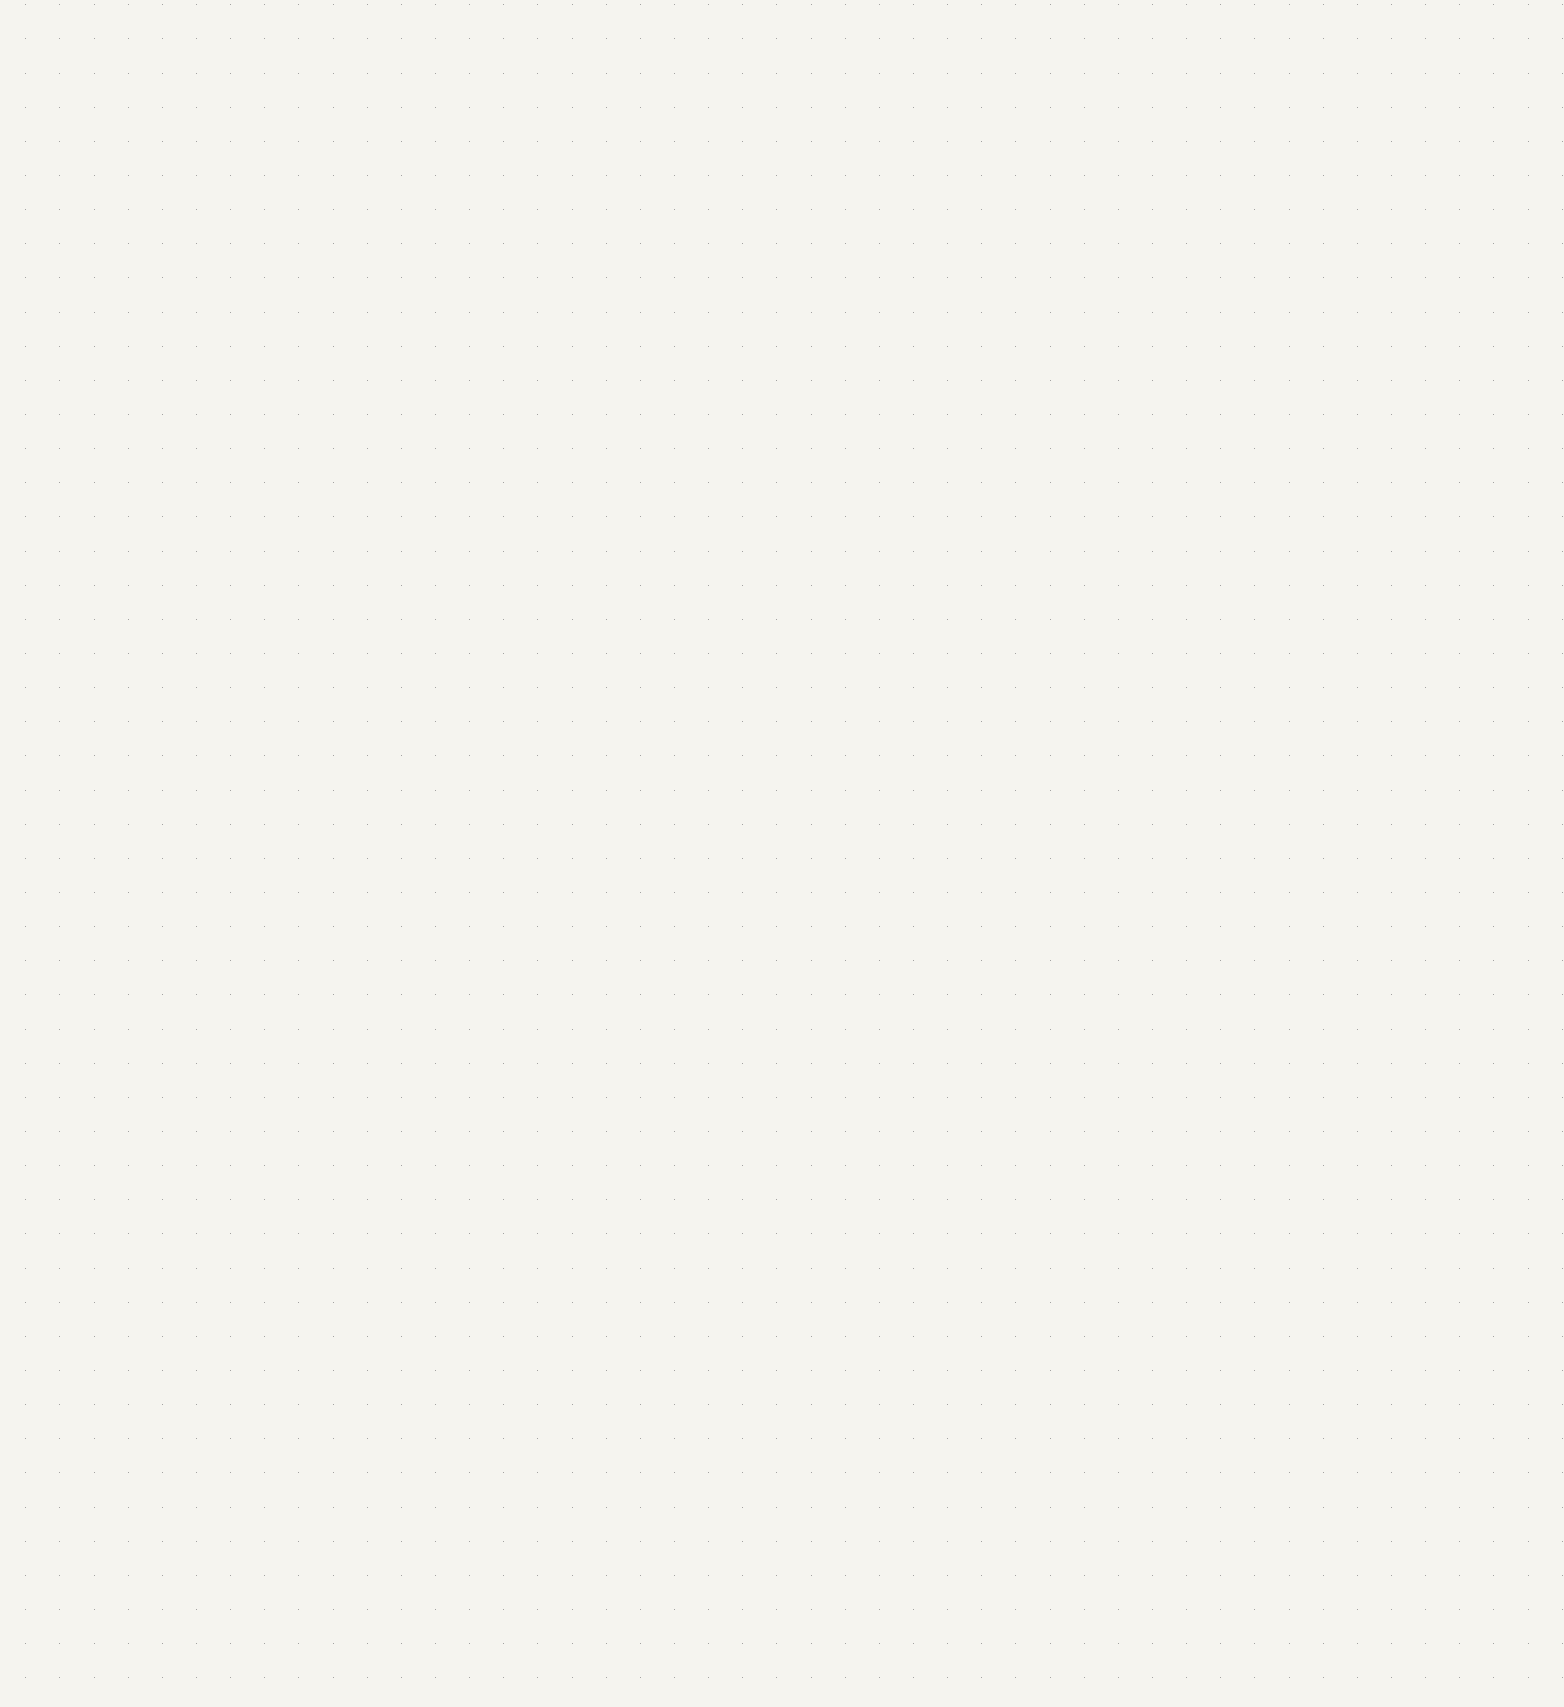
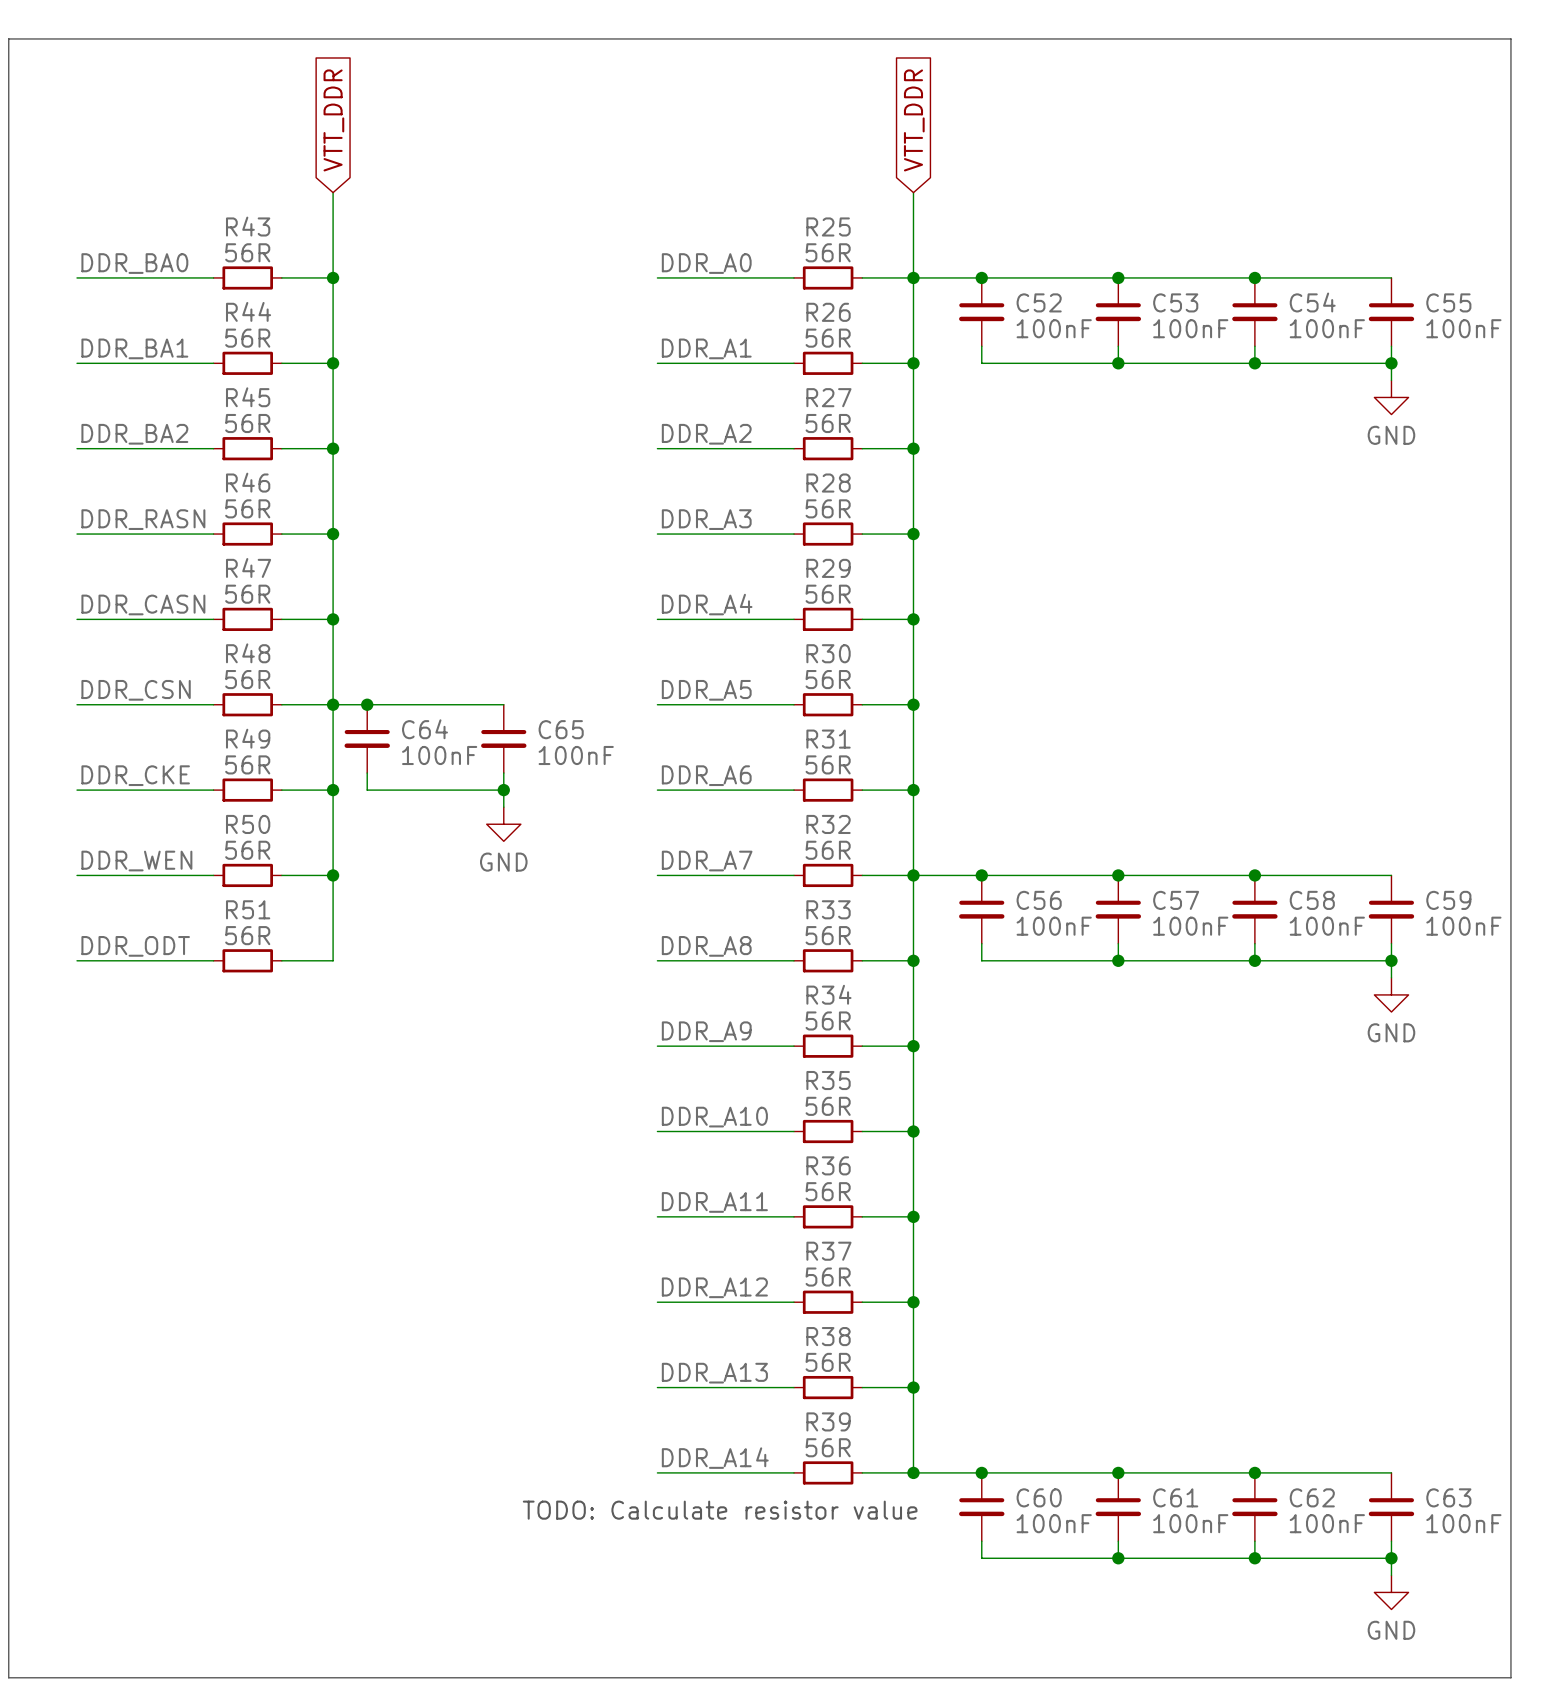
line: none -> (8, 38) (1510, 38) (1510, 1677) (8, 1677) (8, 38)
global label: none -> VTT_DDR (333, 120)
global label: none -> VTT_DDR (914, 120)
wire: none -> (333, 192) (333, 960) (281, 960)
wire: none -> (913, 192) (913, 1472)
label: none -> DDR_BA0 (134, 263)
label: none -> DDR_A0 (706, 263)
wire: none -> (77, 277) (213, 277)
R43: none -> 56R (247, 277)
wire: none -> (281, 277) (333, 277)
junction: none -> (333, 277)
wire: none -> (657, 277) (793, 277)
R25: none -> 56R (828, 277)
wire: none -> (862, 277) (1391, 277)
junction: none -> (913, 277)
junction: none -> (981, 277)
junction: none -> (1118, 277)
junction: none -> (1254, 277)
C52: none -> 100nF (981, 312)
C53: none -> 100nF (1118, 312)
C54: none -> 100nF (1254, 312)
C55: none -> 100nF (1391, 312)
wire: none -> (981, 346) (981, 363) (1391, 363)
wire: none -> (1118, 346) (1118, 363)
wire: none -> (1254, 346) (1254, 363)
wire: none -> (1391, 346) (1391, 380)
label: none -> DDR_BA1 (134, 348)
label: none -> DDR_A1 (706, 348)
wire: none -> (77, 363) (213, 363)
R44: none -> 56R (247, 363)
wire: none -> (281, 363) (333, 363)
junction: none -> (333, 363)
wire: none -> (657, 363) (793, 363)
R26: none -> 56R (828, 363)
wire: none -> (862, 363) (913, 363)
junction: none -> (913, 363)
junction: none -> (1118, 363)
junction: none -> (1254, 363)
junction: none -> (1391, 363)
power symbol: none -> GND (1391, 397)
label: none -> DDR_BA2 (134, 434)
label: none -> DDR_A2 (706, 434)
wire: none -> (77, 448) (213, 448)
R45: none -> 56R (247, 448)
wire: none -> (281, 448) (333, 448)
junction: none -> (333, 448)
wire: none -> (657, 448) (793, 448)
R27: none -> 56R (828, 448)
wire: none -> (862, 448) (913, 448)
junction: none -> (913, 448)
label: none -> DDR_RASN (143, 519)
label: none -> DDR_A3 (706, 519)
wire: none -> (77, 534) (213, 534)
R46: none -> 56R (247, 534)
wire: none -> (281, 534) (333, 534)
junction: none -> (333, 534)
wire: none -> (657, 534) (793, 534)
R28: none -> 56R (828, 534)
wire: none -> (862, 534) (913, 534)
junction: none -> (913, 534)
label: none -> DDR_CASN (143, 604)
label: none -> DDR_A4 (707, 604)
wire: none -> (77, 619) (213, 619)
R47: none -> 56R (247, 619)
wire: none -> (281, 619) (333, 619)
junction: none -> (333, 619)
wire: none -> (657, 619) (793, 619)
R29: none -> 56R (828, 619)
wire: none -> (862, 619) (913, 619)
junction: none -> (913, 619)
label: none -> DDR_CSN (136, 690)
label: none -> DDR_A5 (706, 690)
wire: none -> (77, 704) (213, 704)
R48: none -> 56R (247, 704)
wire: none -> (281, 704) (503, 704)
junction: none -> (333, 704)
junction: none -> (367, 704)
wire: none -> (657, 704) (793, 704)
R30: none -> 56R (828, 704)
wire: none -> (862, 704) (913, 704)
junction: none -> (913, 704)
C64: none -> 100nF (367, 738)
C65: none -> 100nF (503, 738)
wire: none -> (367, 773) (367, 790) (503, 790)
wire: none -> (503, 773) (503, 807)
label: none -> DDR_CKE (135, 775)
label: none -> DDR_A6 (706, 775)
wire: none -> (77, 790) (213, 790)
R49: none -> 56R (247, 790)
wire: none -> (281, 790) (333, 790)
junction: none -> (333, 790)
junction: none -> (503, 790)
wire: none -> (657, 790) (793, 790)
R31: none -> 56R (828, 790)
wire: none -> (862, 790) (913, 790)
junction: none -> (913, 790)
power symbol: none -> GND (503, 824)
label: none -> DDR_WEN (136, 861)
label: none -> DDR_A7 (707, 861)
wire: none -> (77, 875) (213, 875)
R50: none -> 56R (247, 875)
wire: none -> (281, 875) (333, 875)
junction: none -> (333, 875)
wire: none -> (657, 875) (793, 875)
R32: none -> 56R (828, 875)
wire: none -> (862, 875) (1391, 875)
junction: none -> (913, 875)
junction: none -> (981, 875)
junction: none -> (1118, 875)
junction: none -> (1254, 875)
C56: none -> 100nF (981, 909)
C57: none -> 100nF (1118, 909)
C58: none -> 100nF (1254, 909)
C59: none -> 100nF (1391, 909)
wire: none -> (981, 943) (981, 960) (1391, 960)
wire: none -> (1118, 943) (1118, 960)
wire: none -> (1254, 943) (1254, 960)
wire: none -> (1391, 943) (1391, 977)
label: none -> DDR_ODT (135, 946)
label: none -> DDR_A8 (706, 946)
wire: none -> (77, 960) (213, 960)
R51: none -> 56R (247, 960)
wire: none -> (657, 960) (793, 960)
R33: none -> 56R (828, 960)
wire: none -> (862, 960) (913, 960)
junction: none -> (913, 960)
junction: none -> (1118, 960)
junction: none -> (1254, 960)
junction: none -> (1391, 960)
power symbol: none -> GND (1391, 994)
label: none -> DDR_A9 (706, 1031)
wire: none -> (657, 1046) (793, 1046)
R34: none -> 56R (828, 1046)
wire: none -> (862, 1046) (913, 1046)
junction: none -> (913, 1046)
label: none -> DDR_A10 (714, 1117)
wire: none -> (657, 1131) (793, 1131)
R35: none -> 56R (828, 1131)
wire: none -> (862, 1131) (913, 1131)
junction: none -> (913, 1131)
label: none -> DDR_A11 (714, 1202)
wire: none -> (657, 1216) (793, 1216)
R36: none -> 56R (828, 1216)
wire: none -> (862, 1216) (913, 1216)
junction: none -> (913, 1216)
label: none -> DDR_A12 (714, 1287)
wire: none -> (657, 1302) (793, 1302)
R37: none -> 56R (828, 1302)
wire: none -> (862, 1302) (913, 1302)
junction: none -> (913, 1302)
label: none -> DDR_A13 (714, 1373)
wire: none -> (657, 1387) (793, 1387)
R38: none -> 56R (828, 1387)
wire: none -> (862, 1387) (913, 1387)
junction: none -> (913, 1387)
label: none -> DDR_A14 (715, 1458)
wire: none -> (657, 1472) (793, 1472)
R39: none -> 56R (828, 1472)
wire: none -> (862, 1472) (1391, 1472)
junction: none -> (913, 1472)
junction: none -> (981, 1472)
junction: none -> (1118, 1472)
junction: none -> (1254, 1472)
C60: none -> 100nF (981, 1507)
C61: none -> 100nF (1118, 1507)
C62: none -> 100nF (1254, 1507)
C63: none -> 100nF (1391, 1507)
text: none -> TODO: Calculate resistor value (720, 1510)
wire: none -> (981, 1541) (981, 1558) (1391, 1558)
wire: none -> (1118, 1541) (1118, 1558)
wire: none -> (1254, 1541) (1254, 1558)
wire: none -> (1391, 1541) (1391, 1575)
junction: none -> (1118, 1558)
junction: none -> (1254, 1558)
junction: none -> (1391, 1558)
power symbol: none -> GND (1391, 1592)

